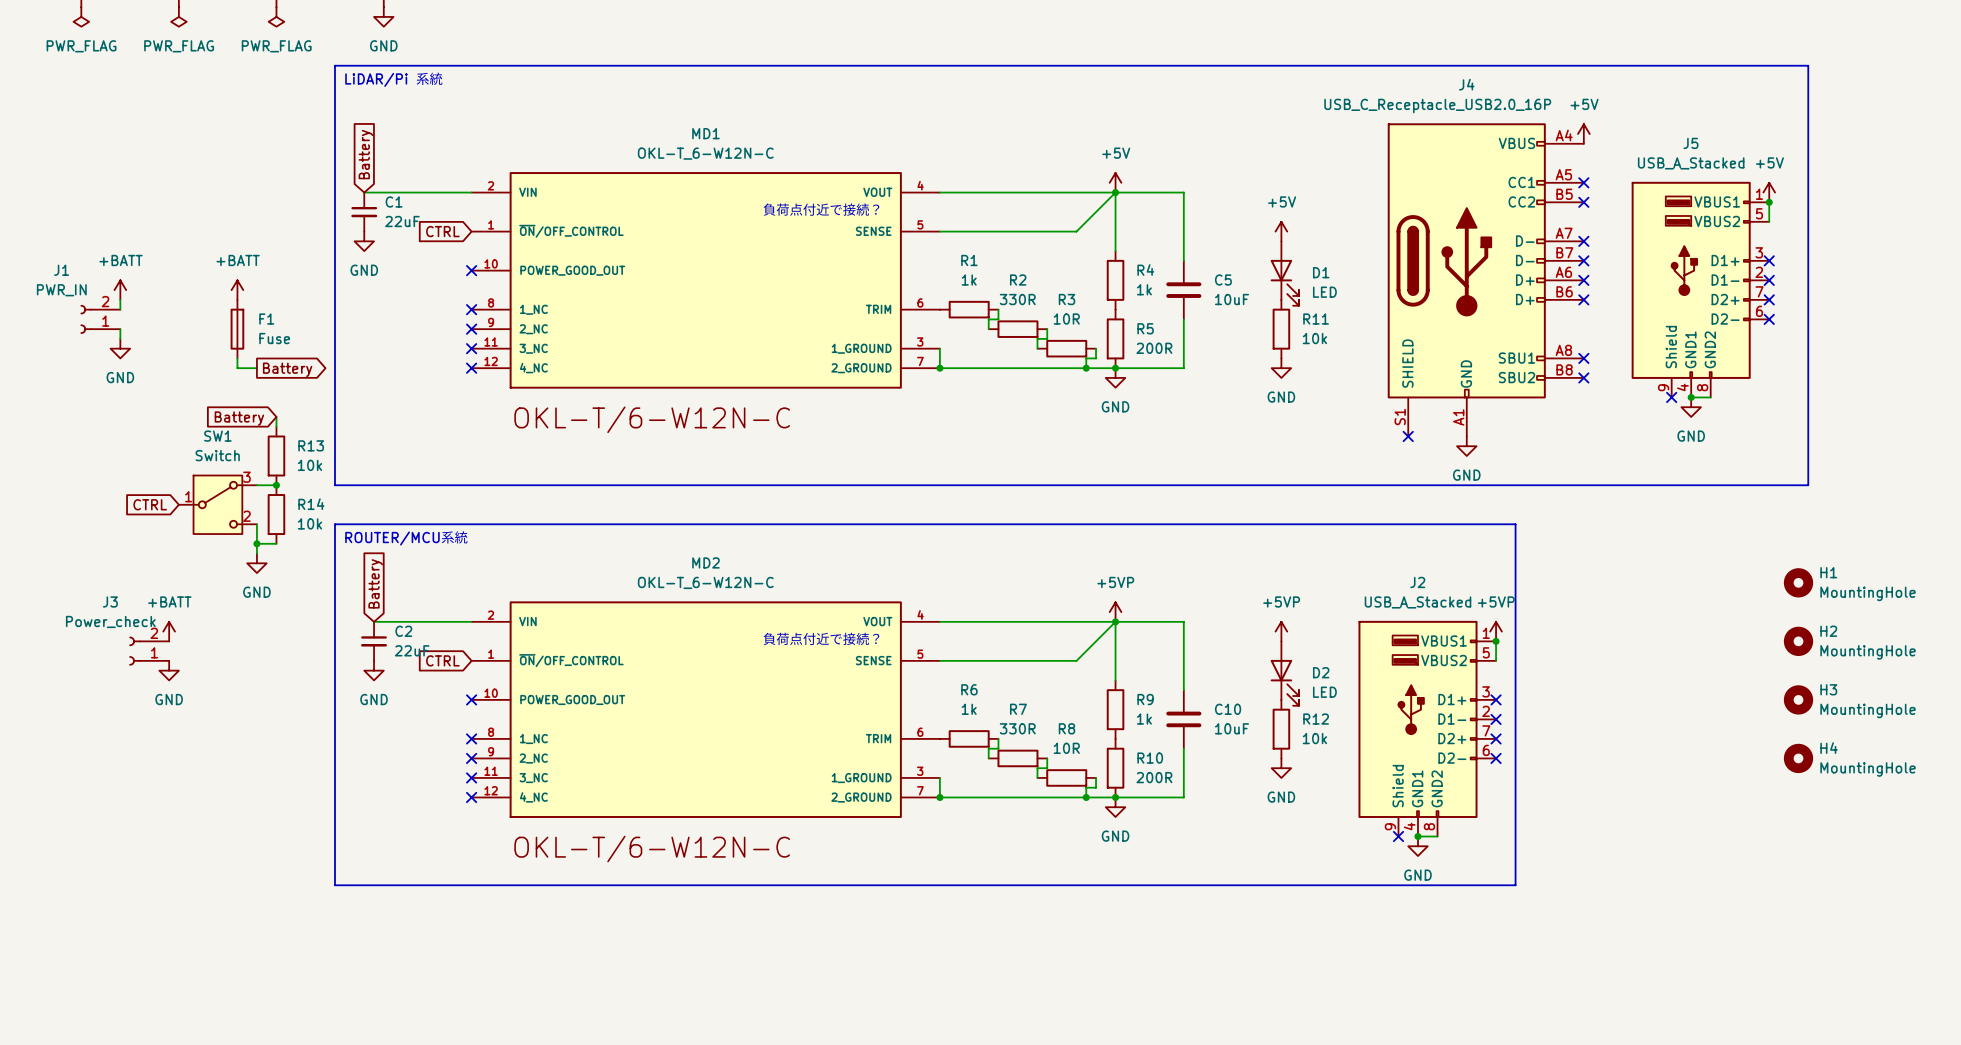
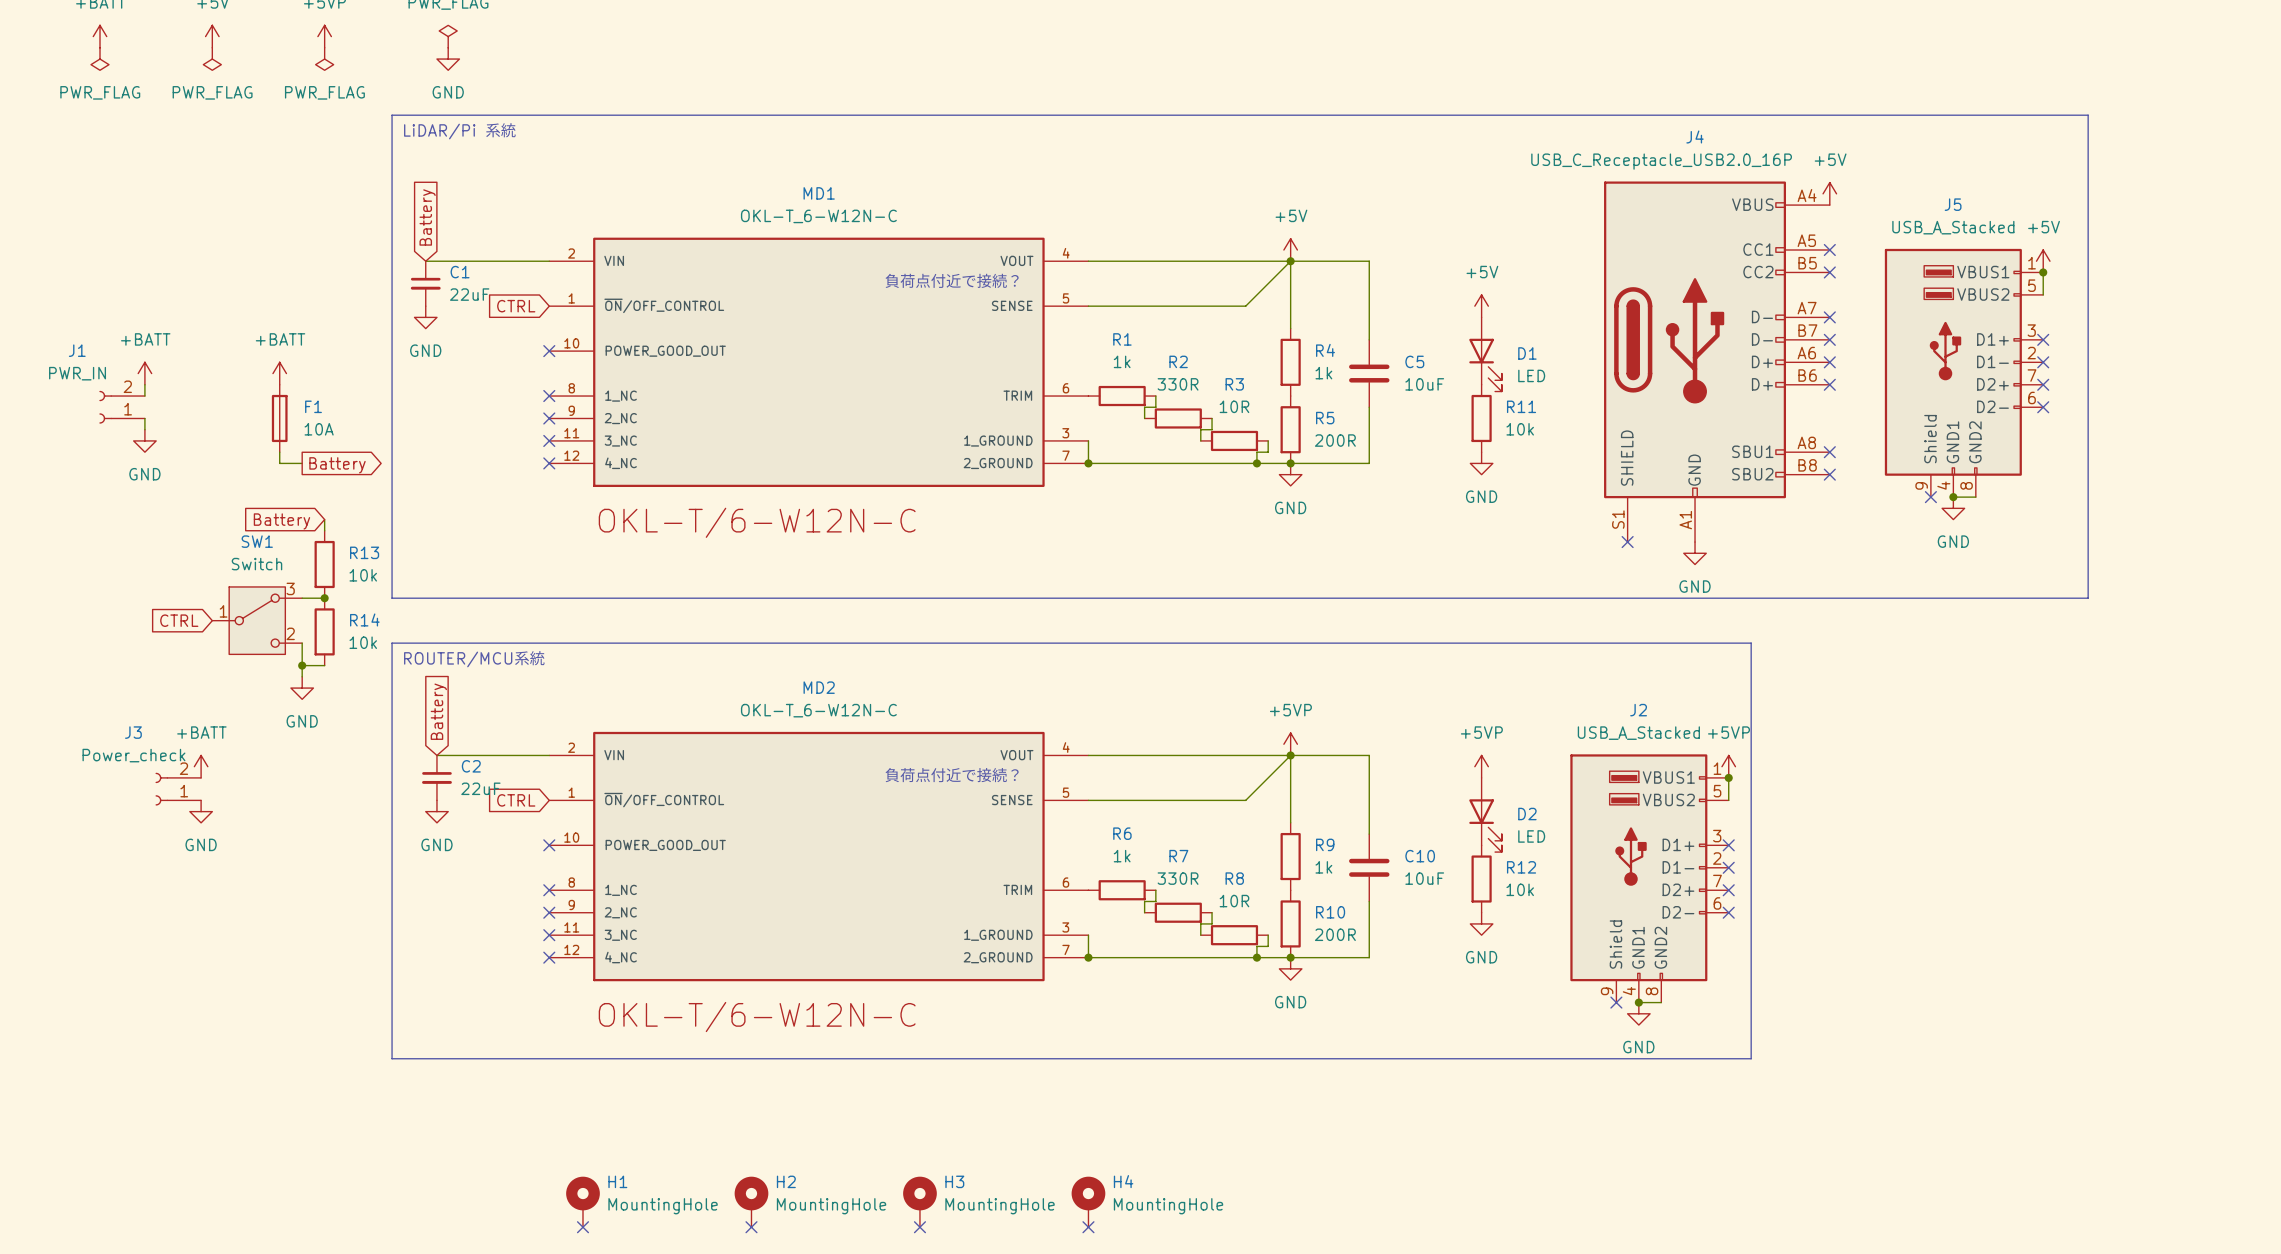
F1 value: Fuse (274, 338) -> 10A (319, 429)
H1 symbol: [1783, 568, 1814, 598] -> [566, 1176, 600, 1228]
H2 symbol: [1783, 626, 1814, 657] -> [734, 1176, 769, 1228]
H3 symbol: [1783, 685, 1814, 715] -> [903, 1176, 937, 1228]
H4 symbol: [1783, 743, 1814, 774] -> [1071, 1176, 1106, 1228]
no-connect mark: none -> (582, 1227)
no-connect mark: none -> (751, 1227)
no-connect mark: none -> (919, 1227)
no-connect mark: none -> (1088, 1227)

